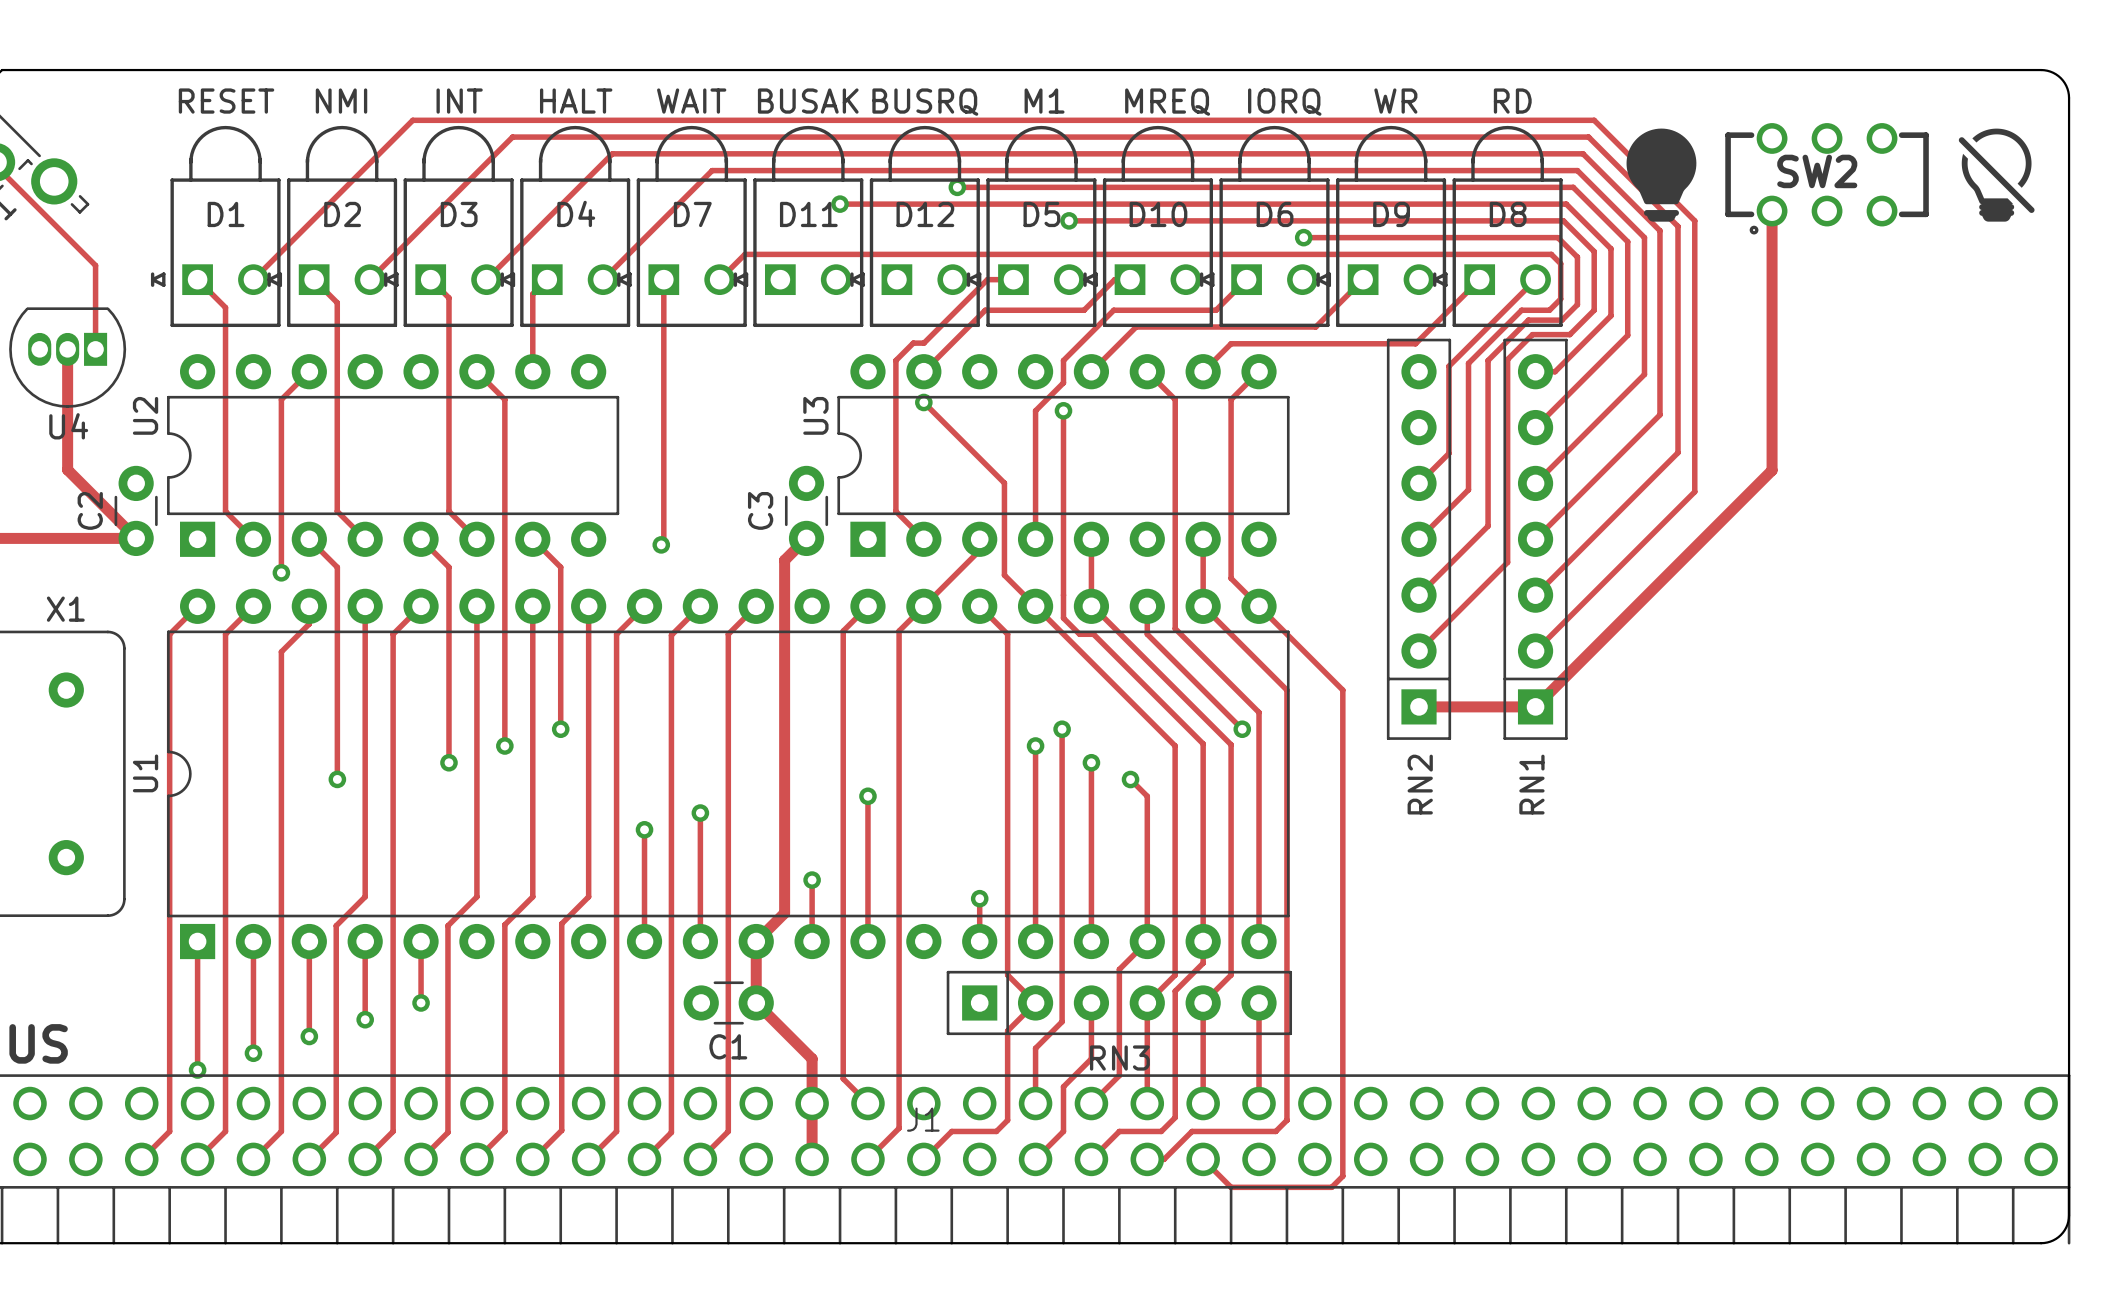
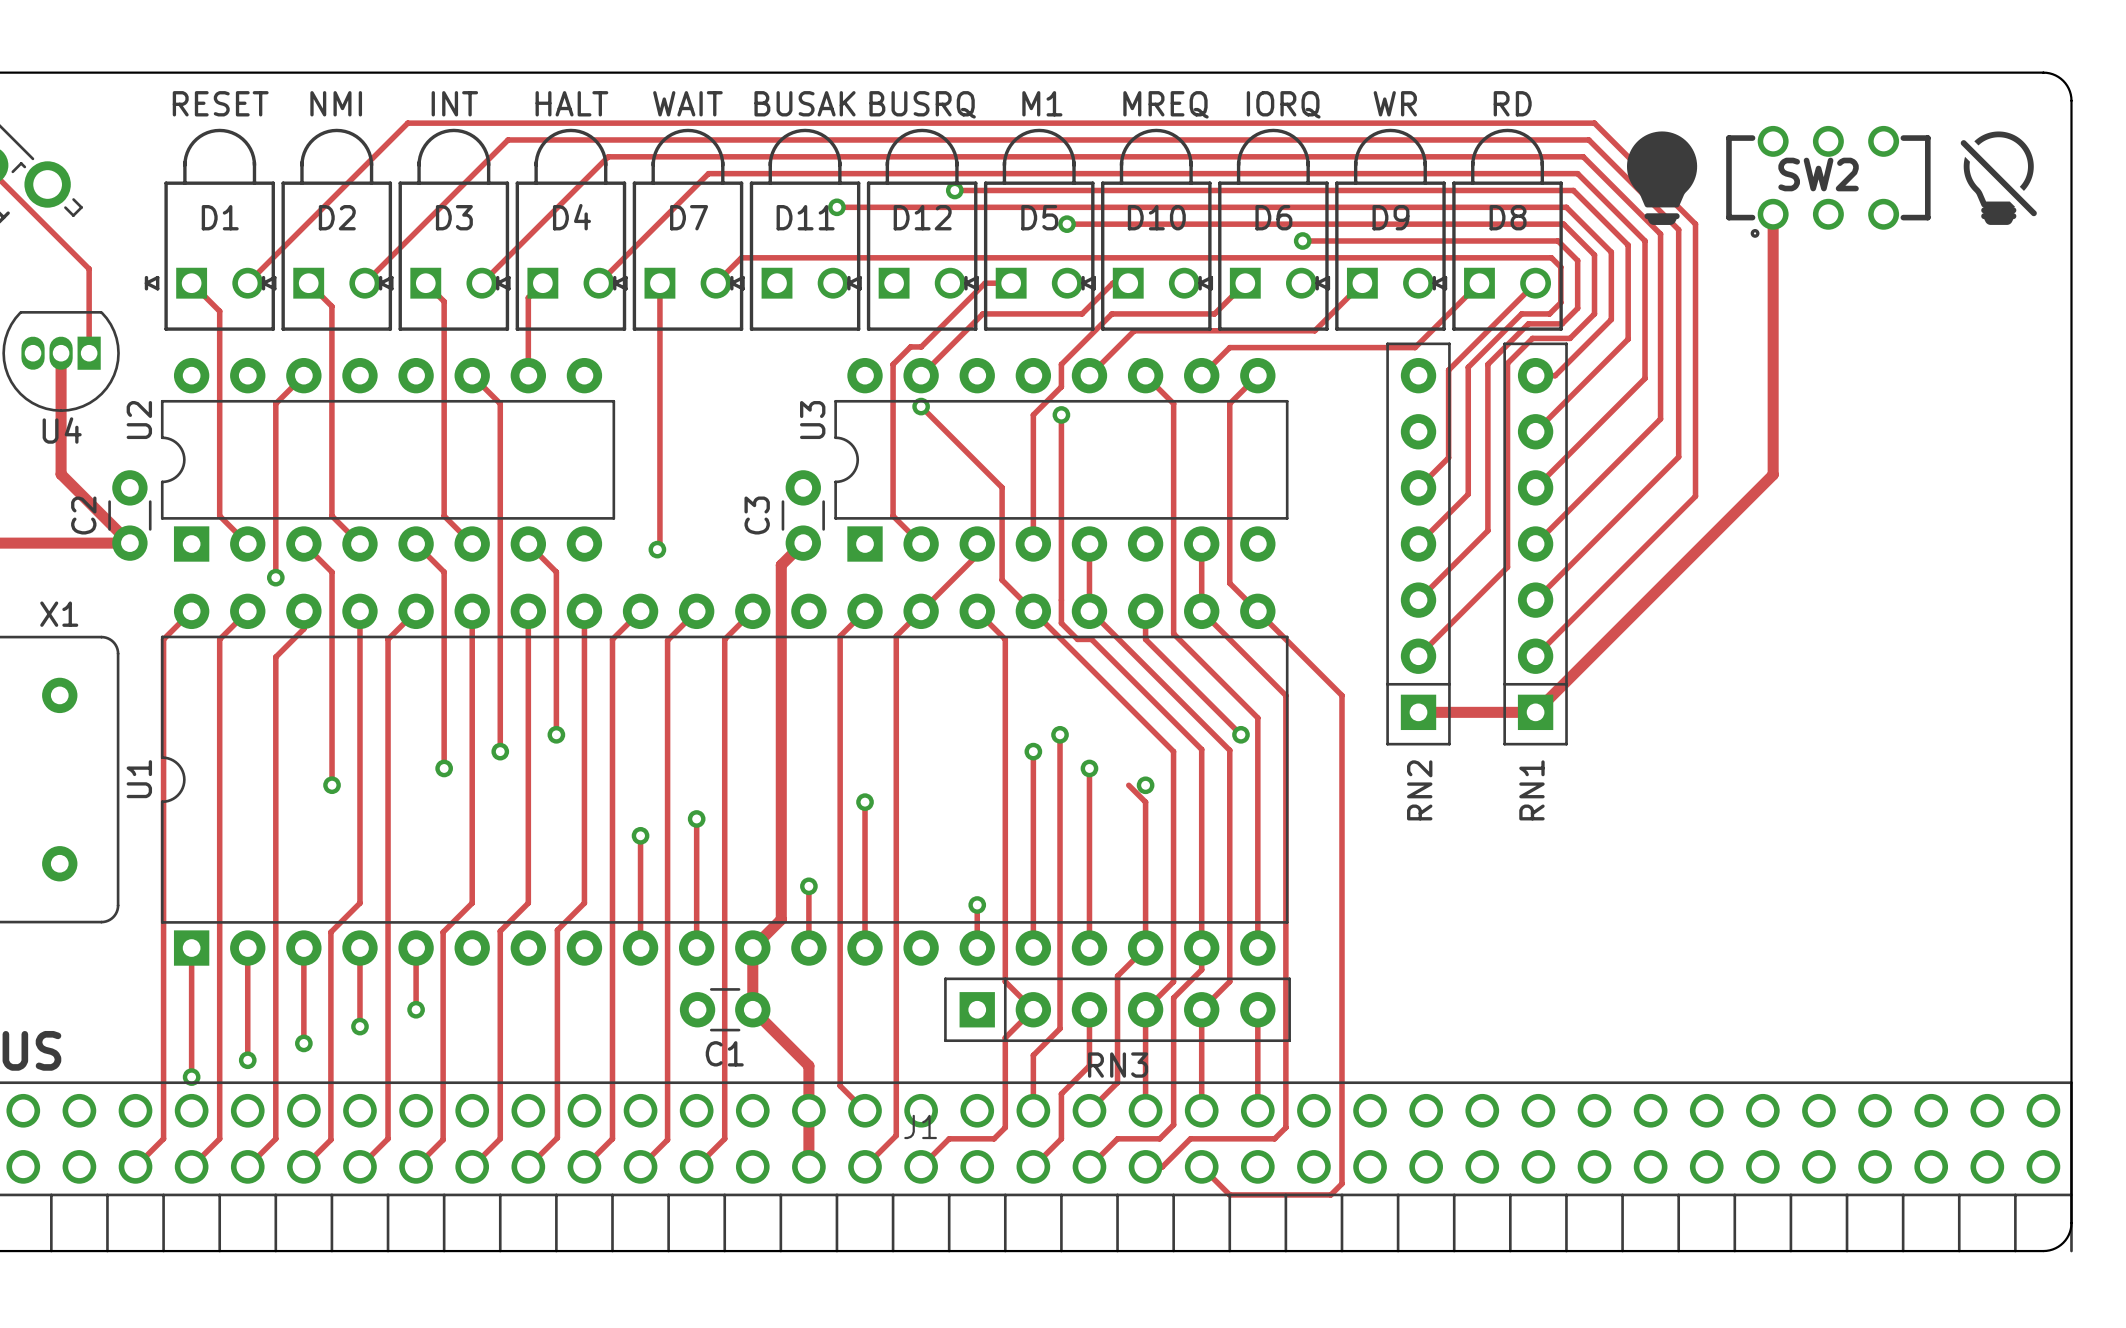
via position: (1130, 779) -> (1145, 785)

